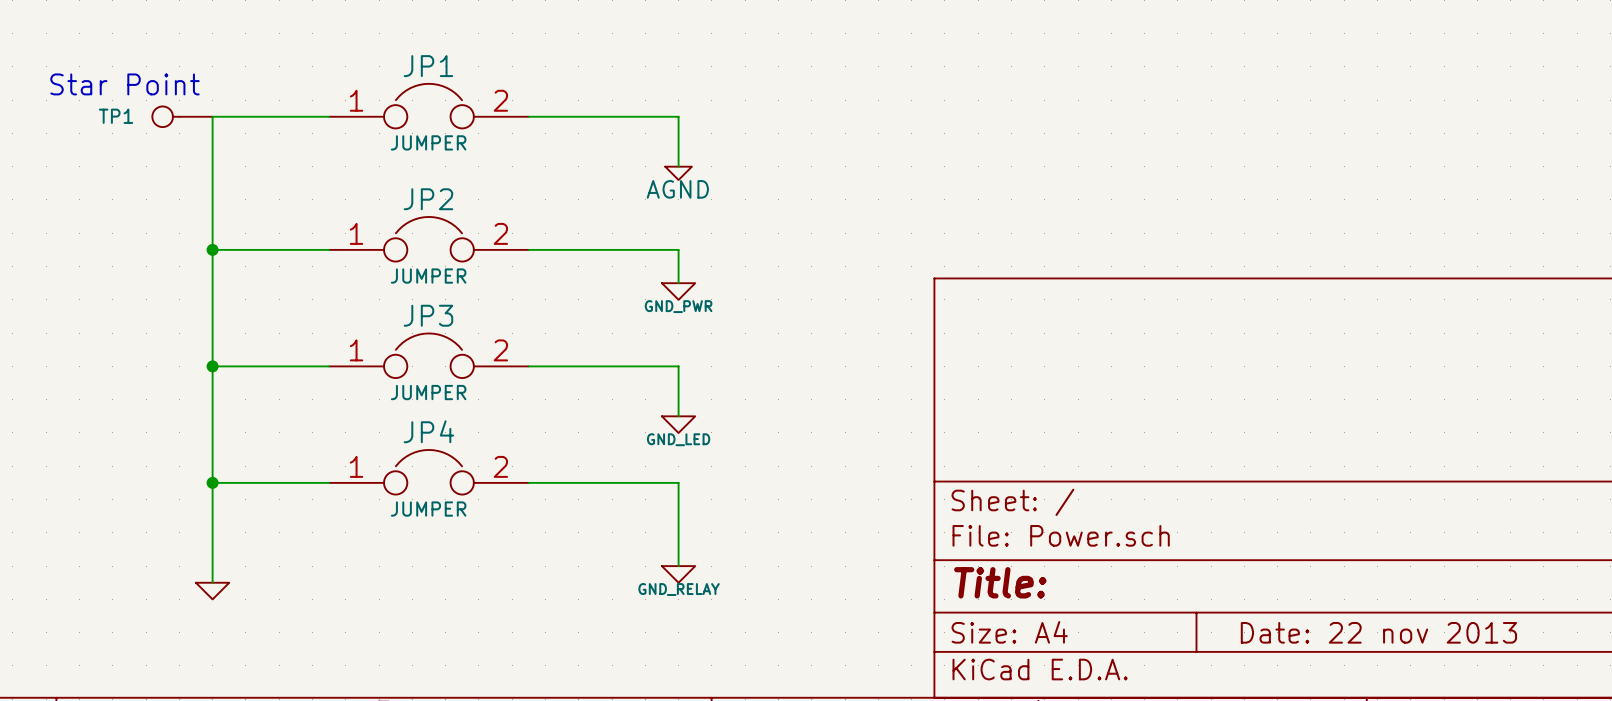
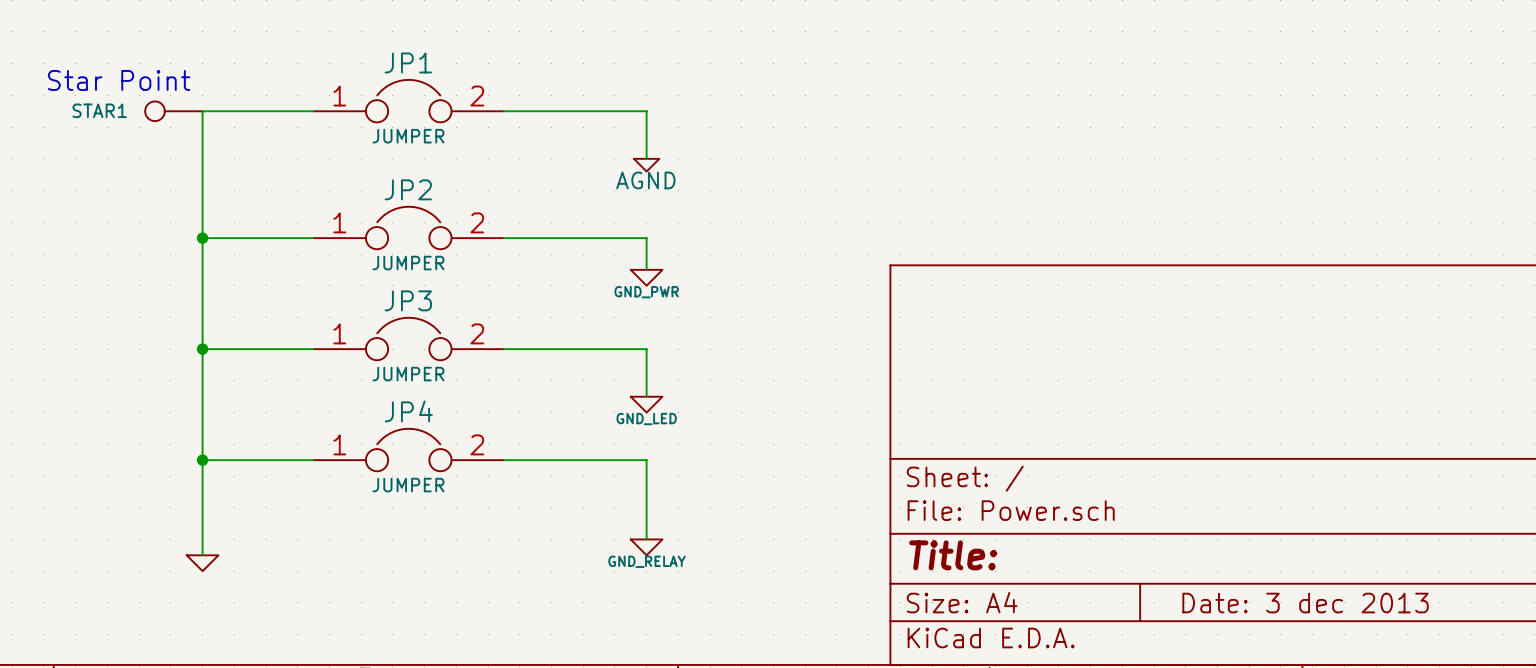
TP1 name: TP1 (116, 116) -> STAR1 (99, 110)
title block: Date: 22 nov 2013 (1378, 632) -> Date: 3 dec 2013 (1305, 603)

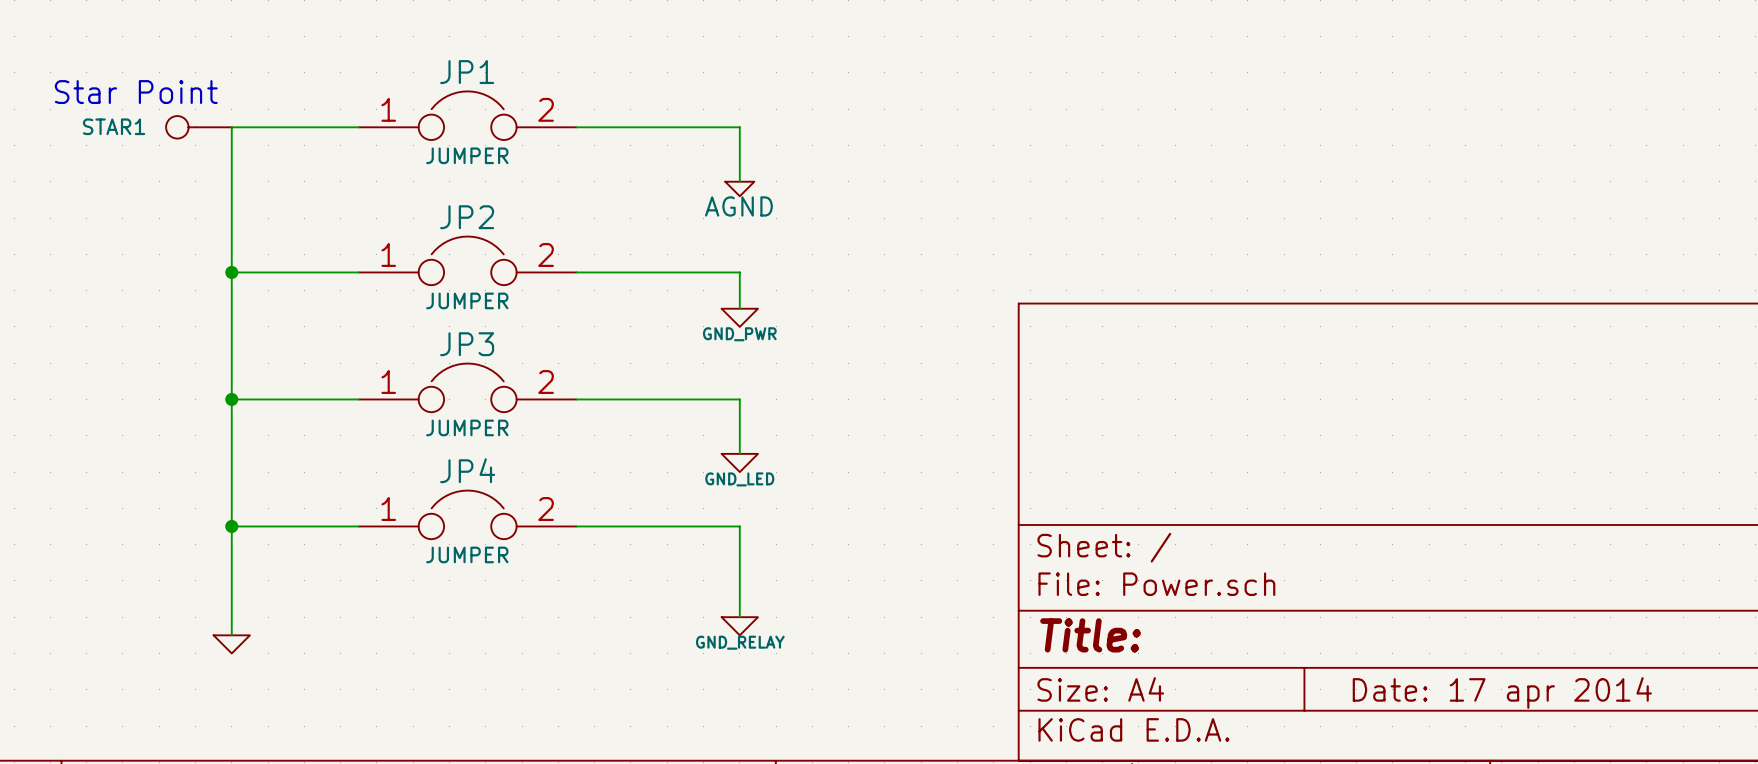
title block: Date: 3 dec 2013 (1305, 603) -> Date: 17 apr 2014 (1502, 692)

